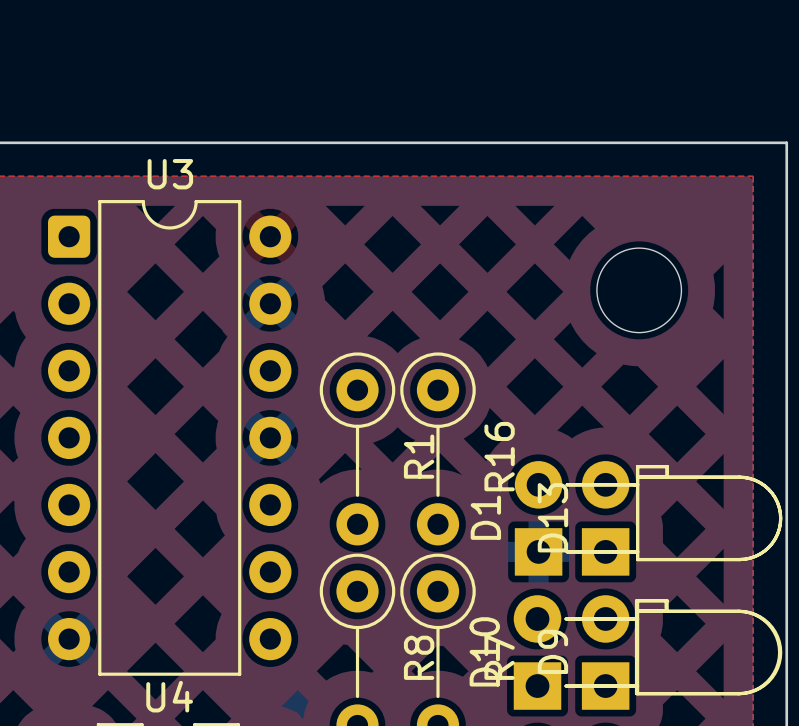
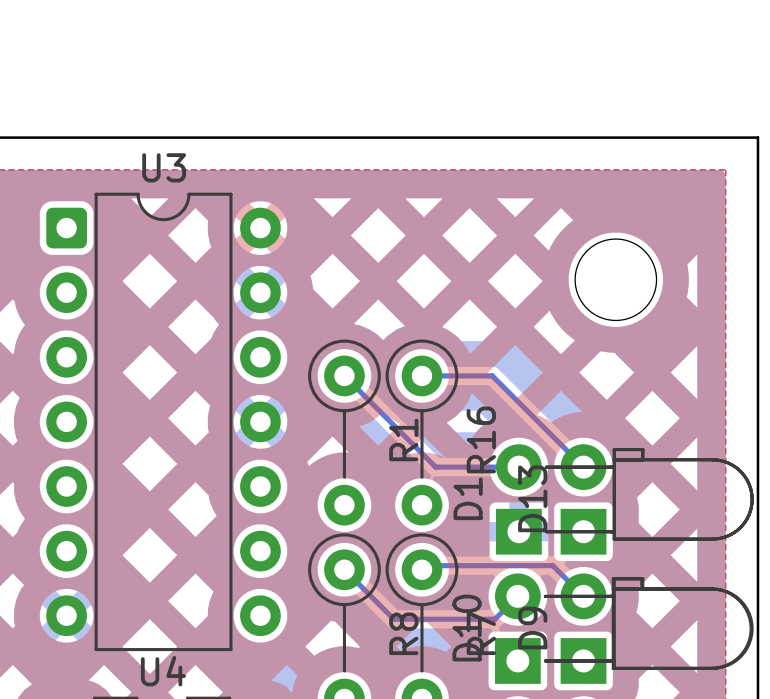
bottom track: none -> (344, 375) (435, 467) (518, 467)
bottom track: none -> (421, 375) (492, 375) (583, 467)
bottom track: none -> (344, 569) (393, 619) (494, 619) (517, 596)
bottom track: none -> (421, 569) (426, 565) (552, 565) (583, 596)

